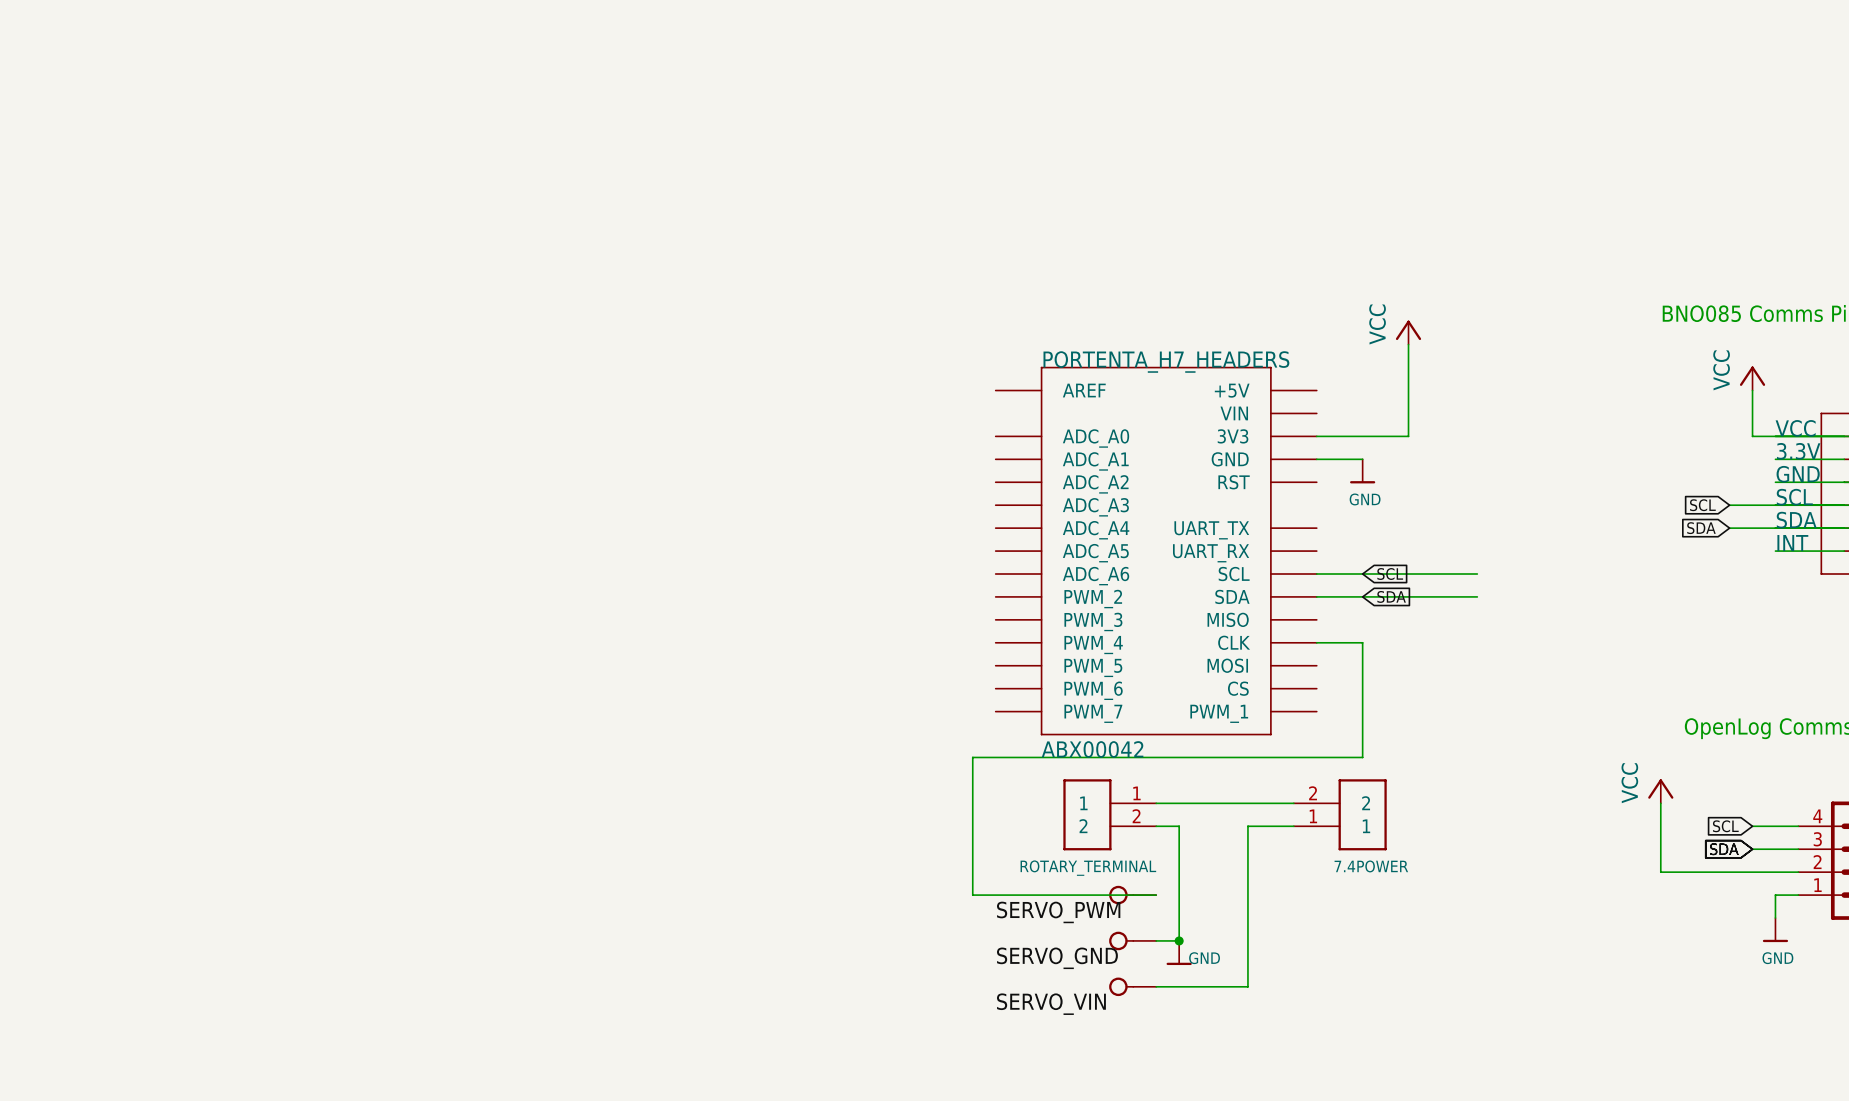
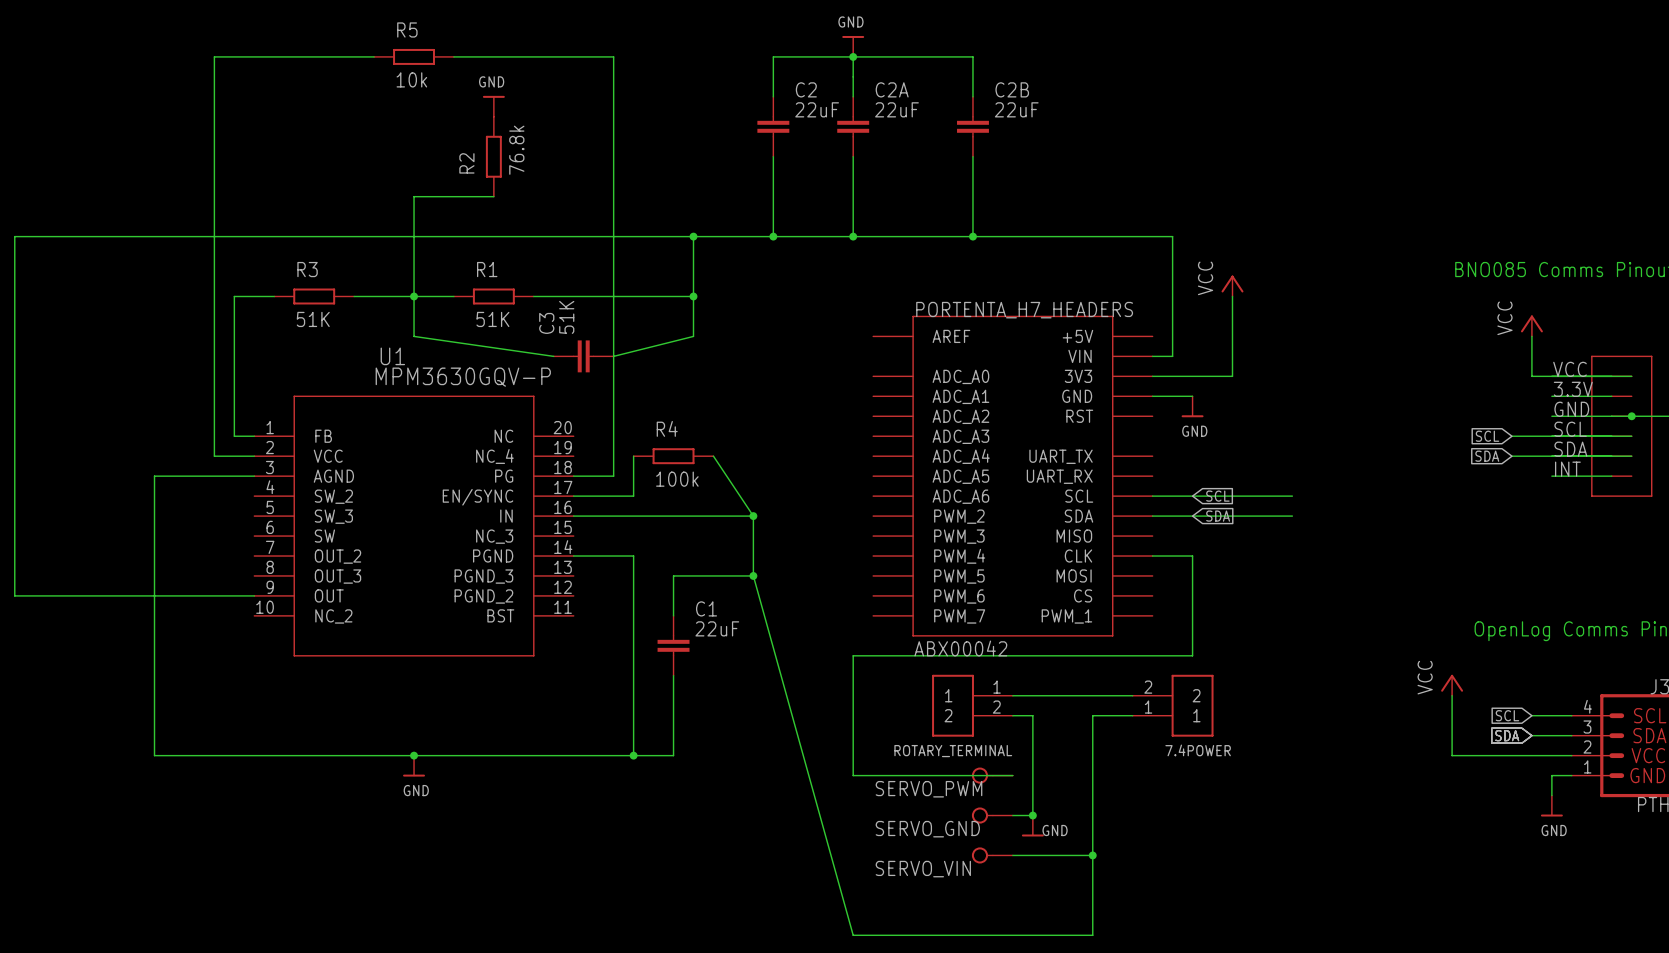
power symbol: none -> GND (853, 46)
wire: none -> (374, 56) (214, 56) (214, 456) (254, 456)
R5: none -> 10k (414, 56)
wire: none -> (453, 56) (613, 56) (613, 476) (573, 476)
wire: none -> (853, 56) (853, 96)
junction: none -> (853, 56)
wire: none -> (773, 96) (773, 56) (972, 56) (972, 96)
power symbol: none -> GND (493, 106)
C2: none -> 22uF (773, 126)
C2A: none -> 22uF (853, 126)
C2B: none -> 22uF (972, 126)
R2: none -> 76.8k (493, 156)
wire: none -> (773, 156) (773, 236)
wire: none -> (853, 156) (853, 236)
wire: none -> (972, 156) (972, 236)
wire: none -> (493, 196) (414, 196) (414, 336) (553, 356)
wire: none -> (693, 236) (693, 336) (613, 356)
junction: none -> (693, 236)
junction: none -> (773, 236)
junction: none -> (853, 236)
junction: none -> (972, 236)
wire: none -> (274, 296) (234, 296) (234, 436) (254, 436)
R3: none -> 51K (314, 296)
wire: none -> (354, 296) (453, 296)
junction: none -> (414, 296)
R1: none -> 51K (493, 296)
wire: none -> (533, 296) (693, 296)
junction: none -> (693, 296)
C3: none -> 51K (583, 356)
wire: none -> (1152, 356) (1172, 356) (1172, 236) (14, 236) (14, 595) (254, 595)
wire: none -> (633, 456) (633, 496) (573, 496)
R4: none -> 100k (673, 456)
wire: none -> (713, 456) (753, 516)
wire: none -> (254, 476) (154, 476) (154, 755) (673, 755) (673, 675)
wire: none -> (573, 516) (753, 516)
wire: none -> (753, 516) (753, 575)
junction: none -> (753, 516)
U1: none -> MPM3630GQV-P (414, 526)
wire: none -> (573, 556) (633, 556) (633, 755)
wire: none -> (753, 575) (853, 935) (1092, 935) (1092, 855)
wire: none -> (753, 575) (673, 575) (673, 615)
junction: none -> (753, 575)
C1: none -> 22uF (673, 645)
junction: none -> (414, 755)
junction: none -> (633, 755)
power symbol: none -> GND (414, 766)
junction: none -> (1092, 855)

